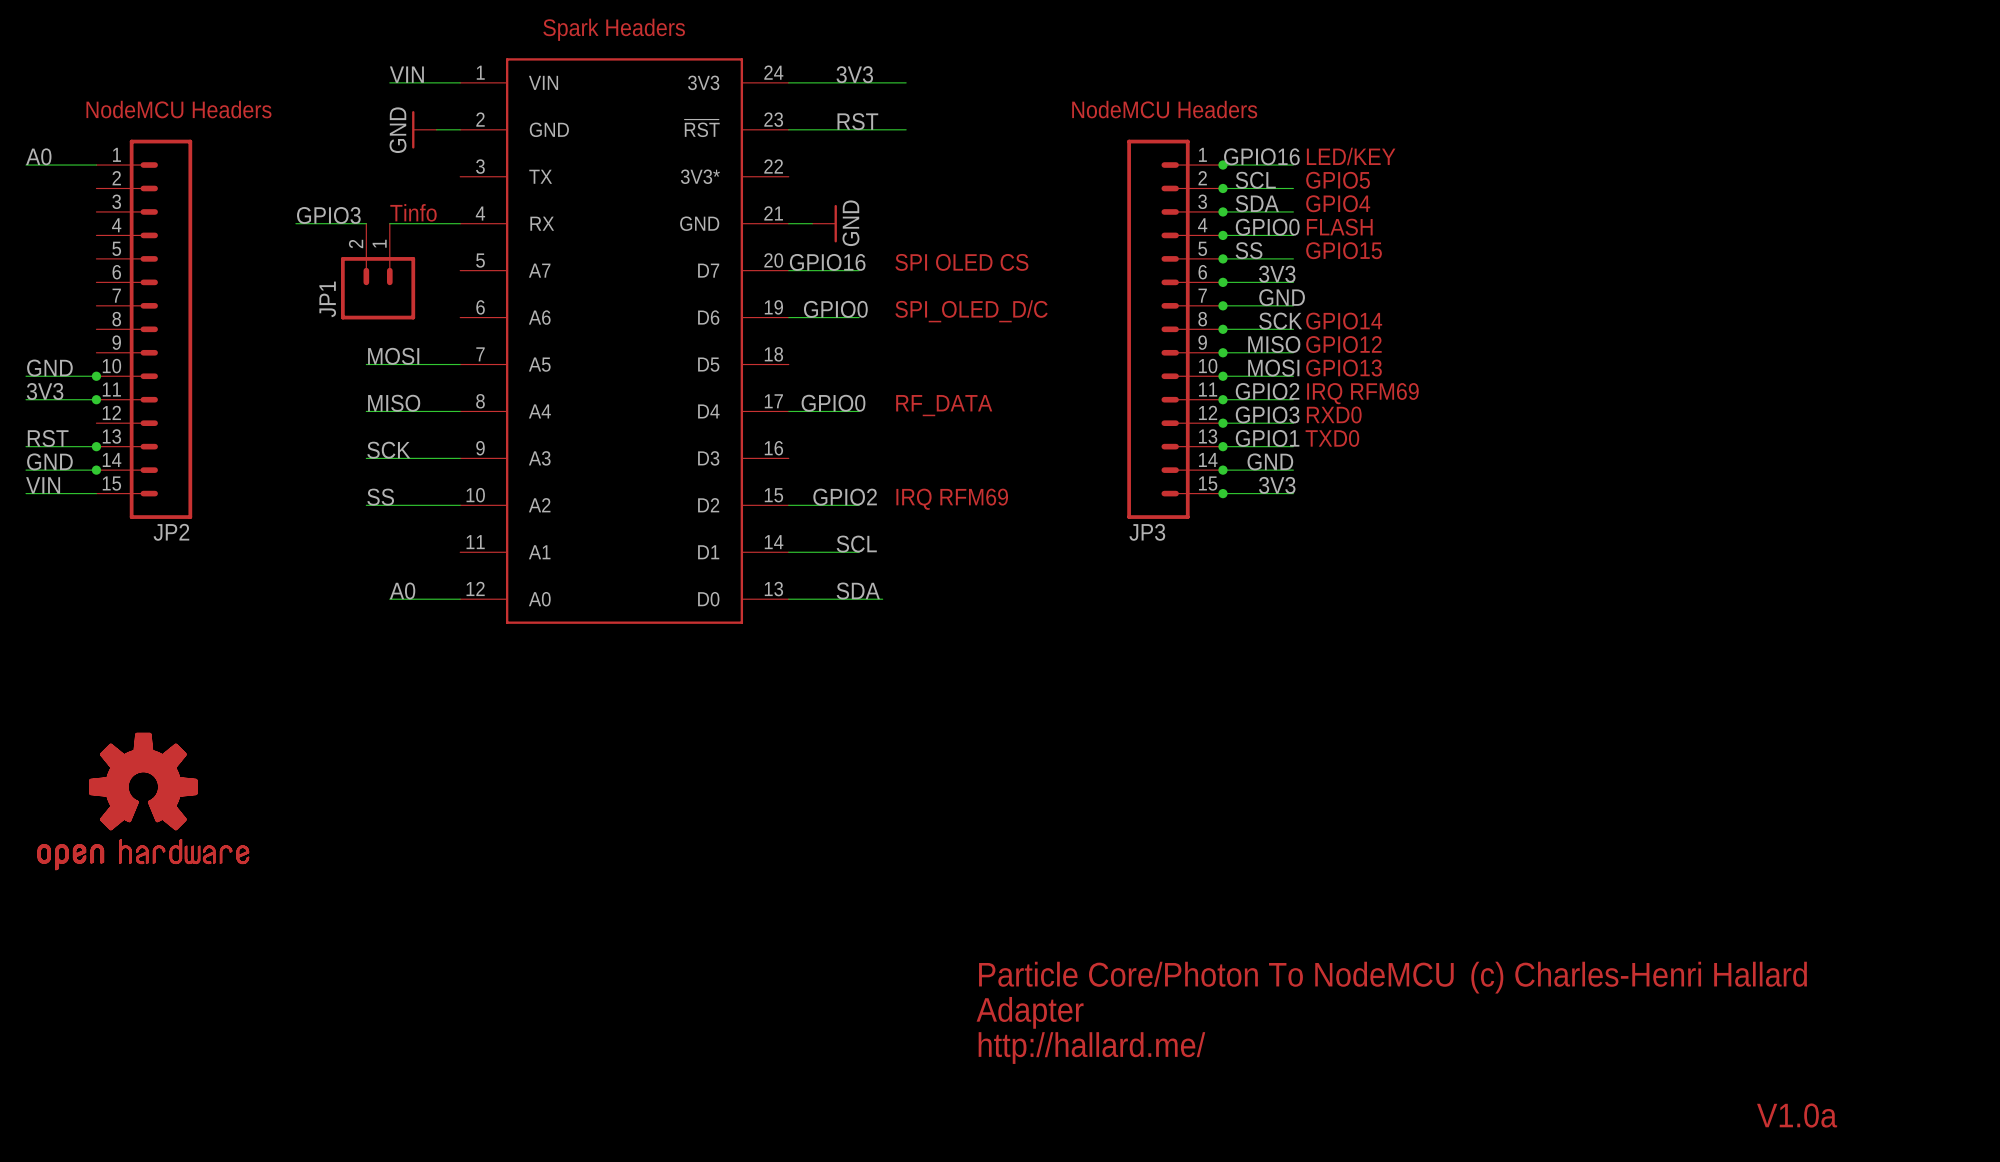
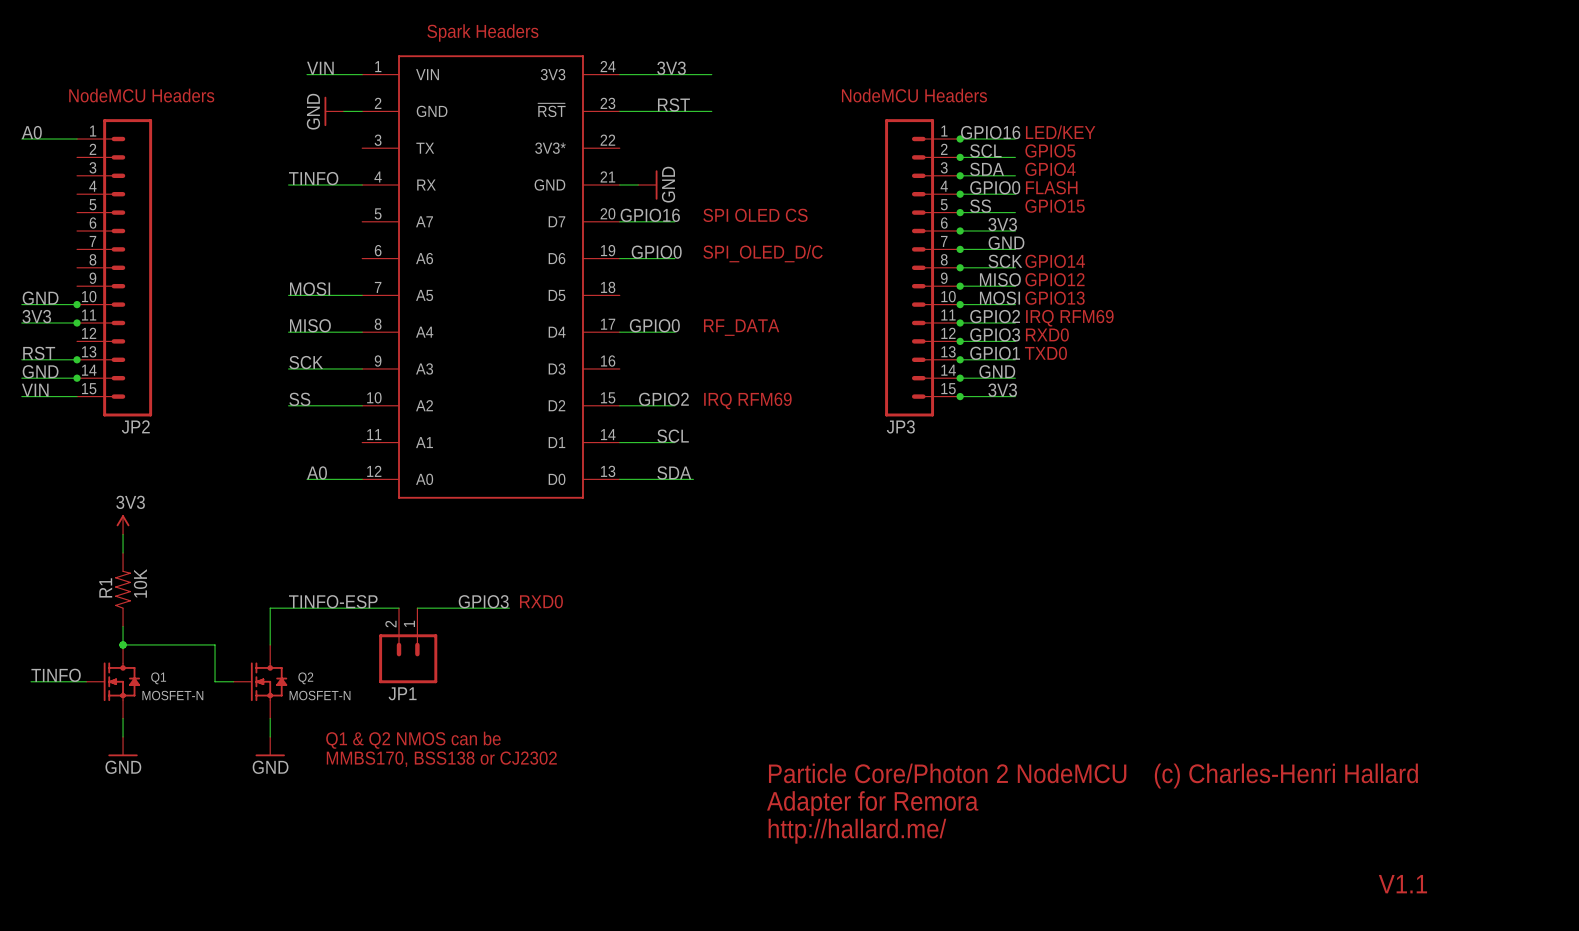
text: Tinfo (413, 212) -> none
label: GPIO3 (328, 215) -> none
label: none -> TINFO (313, 178)
wire: (295, 223) (366, 223) -> (307, 185) (288, 185)
JP1 position: (378, 271) -> (408, 645)
JP1 name rotation: 0° (327, 299) -> 90° clockwise (402, 693)
JP1 name position: JP1 (327, 299) -> JP1 (402, 693)
power symbol: none -> 3V3 (123, 524)
wire: none -> (123, 534) (123, 552)
R1: none -> 10K (123, 589)
label: none -> TINFO-ESP (333, 601)
label: none -> GPIO3 (483, 601)
text: none -> RXD0 (541, 601)
wire: none -> (399, 608) (270, 608) (270, 644)
wire: none -> (417, 608) (509, 608)
wire: none -> (123, 626) (123, 644) (215, 644) (215, 681) (233, 681)
part: (143, 801) -> none
junction: none -> (123, 644)
label: none -> TINFO (56, 675)
wire: none -> (31, 681) (86, 681)
Q1: none -> MOSFET-N (113, 681)
Q2: none -> MOSFET-N (260, 681)
wire: none -> (123, 718) (123, 736)
wire: none -> (270, 718) (270, 736)
text: none -> Q1 & Q2 NMOS can be (413, 740)
power symbol: none -> GND (123, 746)
power symbol: none -> GND (270, 746)
text: none -> MMBS170, BSS138 or CJ2302 (441, 759)
text: Particle Core/Photon To NodeMCU (1216, 974) -> Particle Core/Photon 2 NodeMCU (947, 773)
text: Adapter (1030, 1012) -> Adapter for Remora (872, 803)
text: V1.0a (1797, 1115) -> V1.1 (1402, 884)

